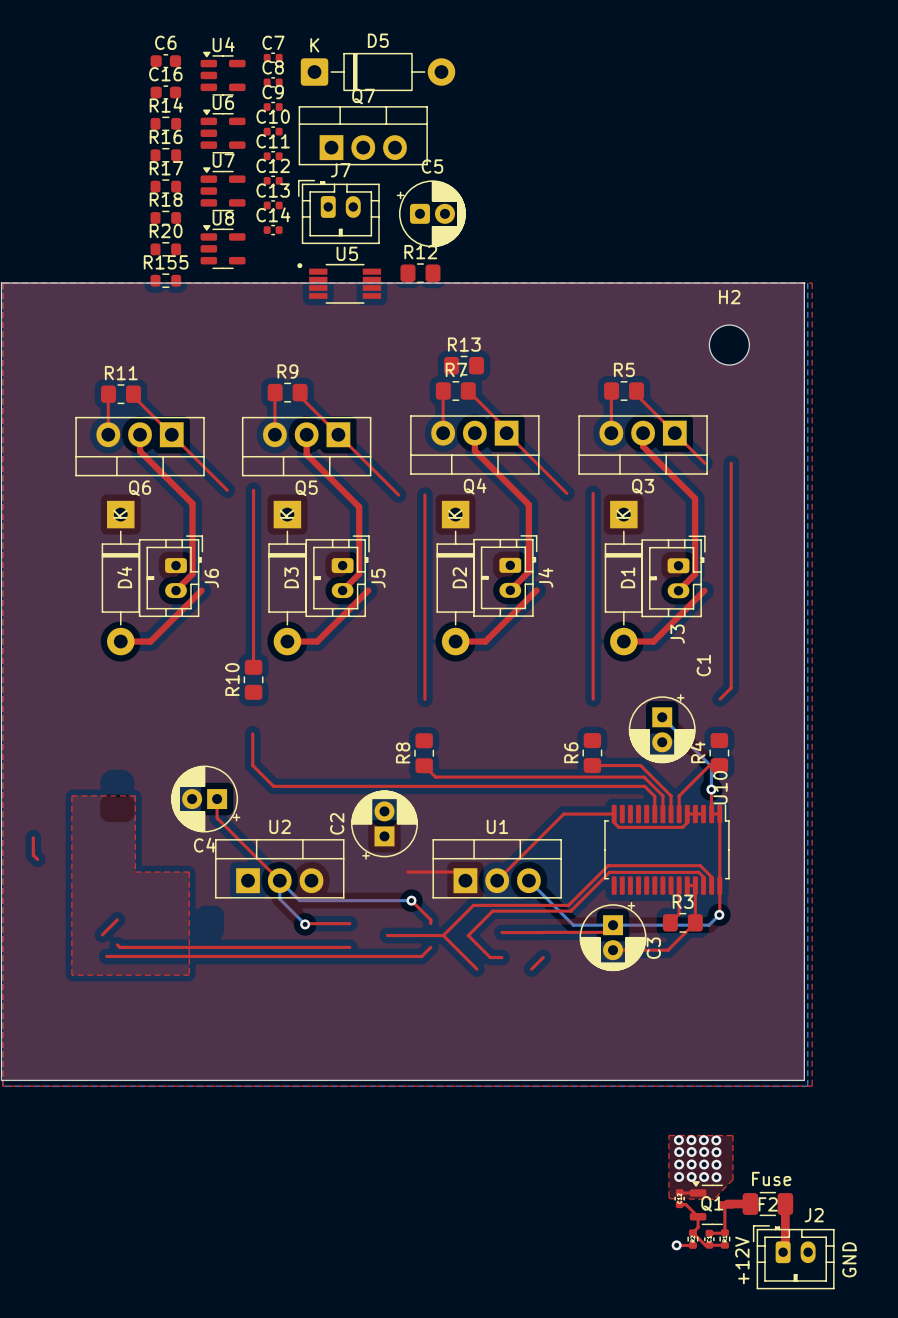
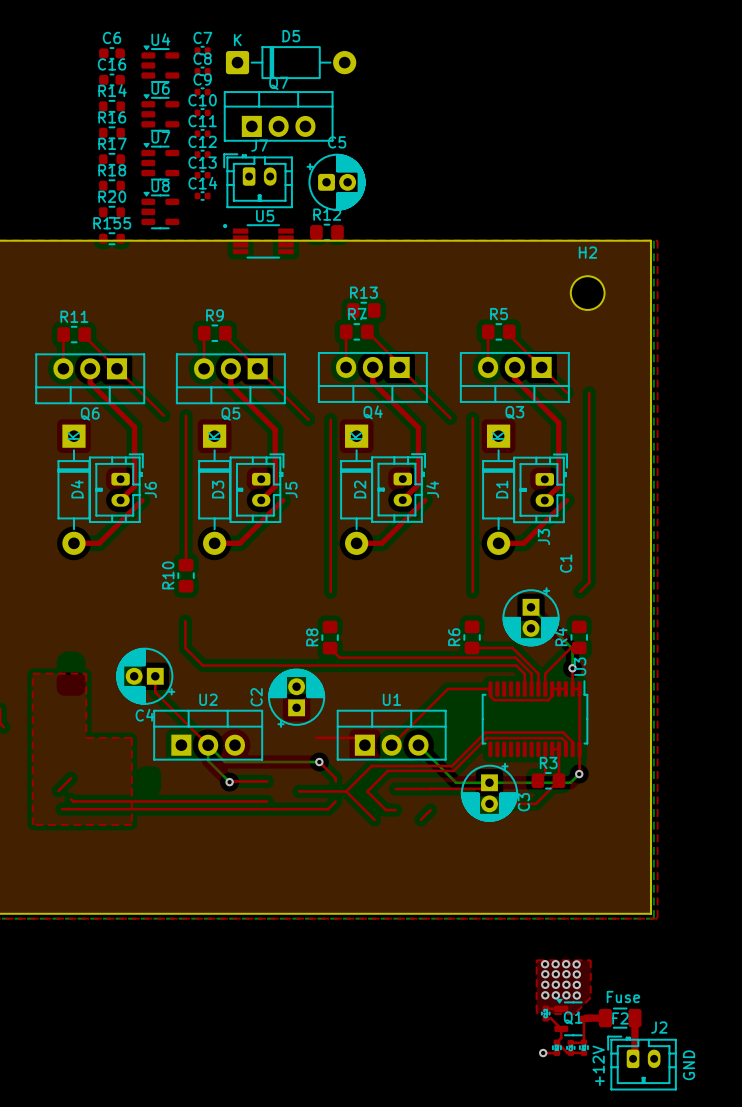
U10 name: U10 (720, 787) -> U3 (580, 666)

